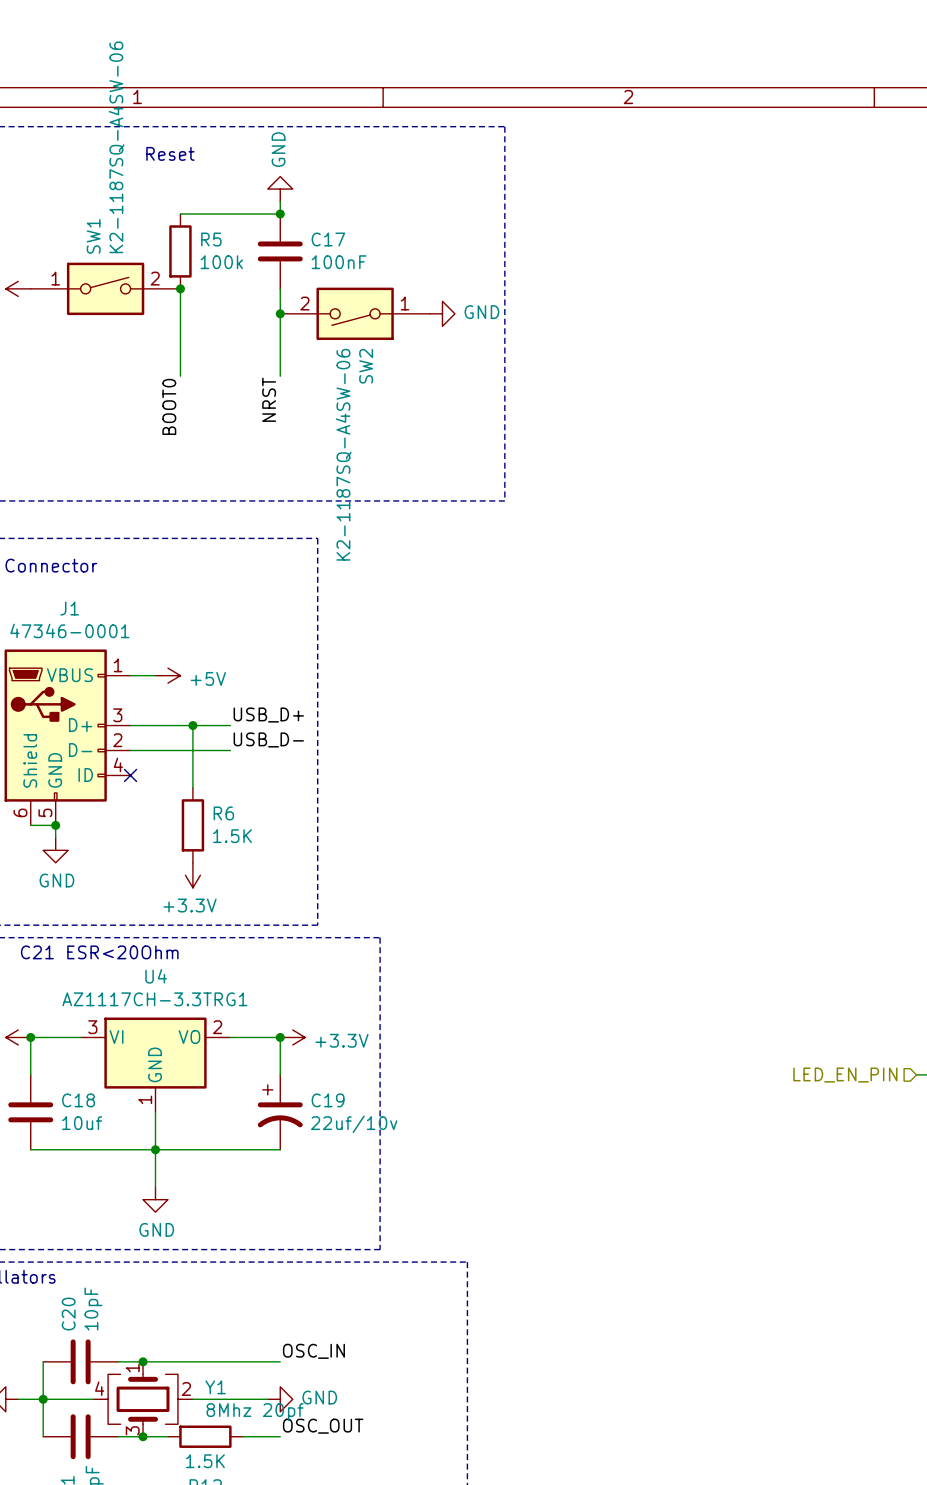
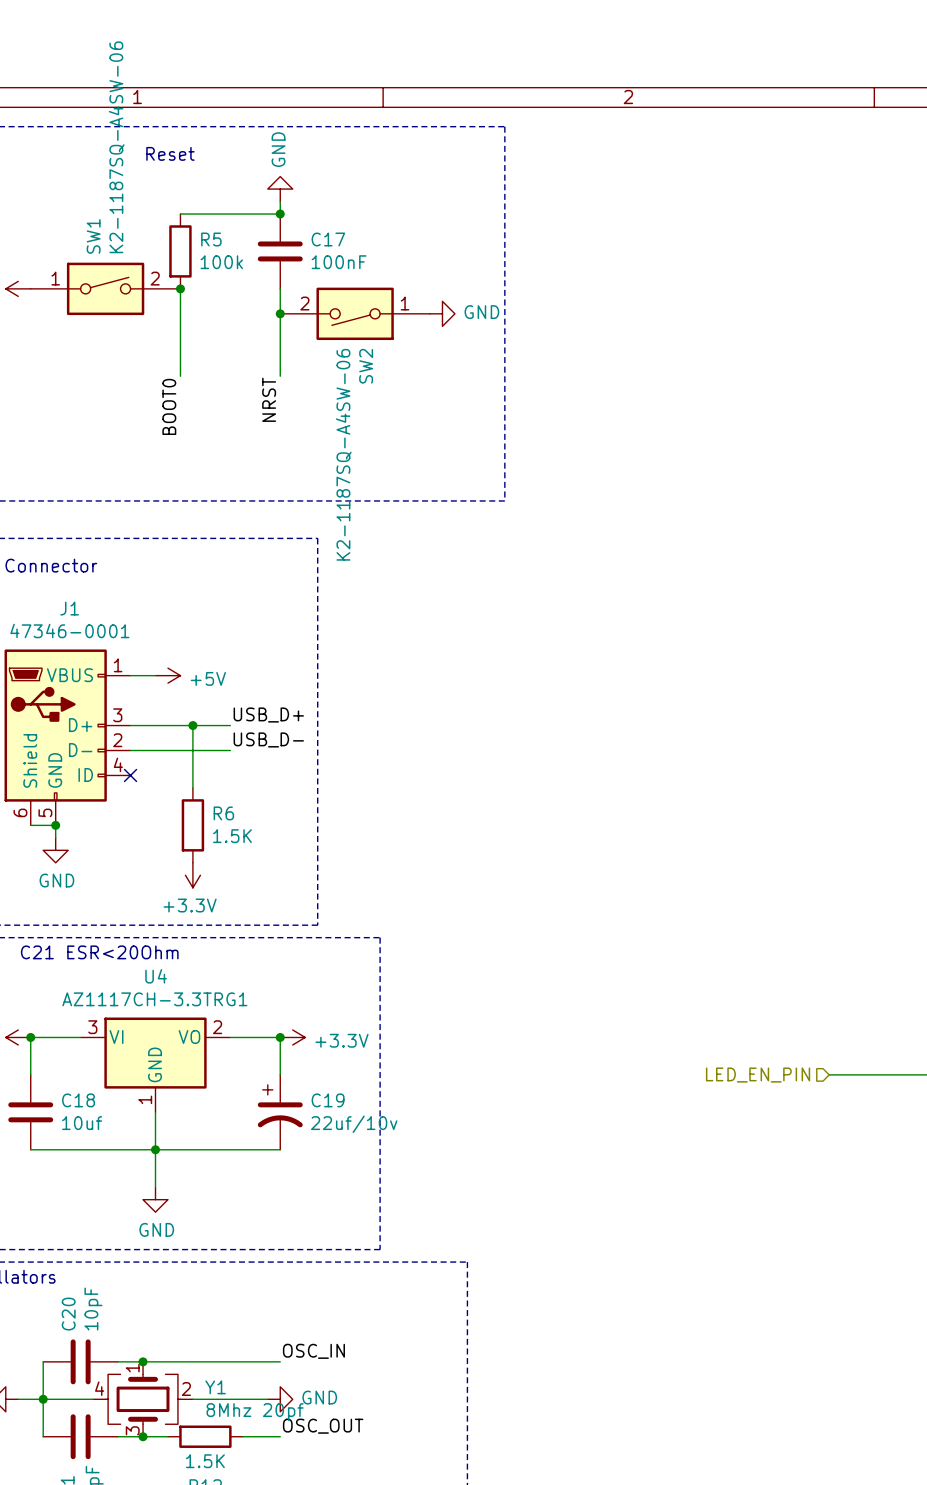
wire: none -> (829, 1074) (916, 1074)
hierarchical label position: LED_EN_PIN (845, 1075) -> LED_EN_PIN (758, 1075)

